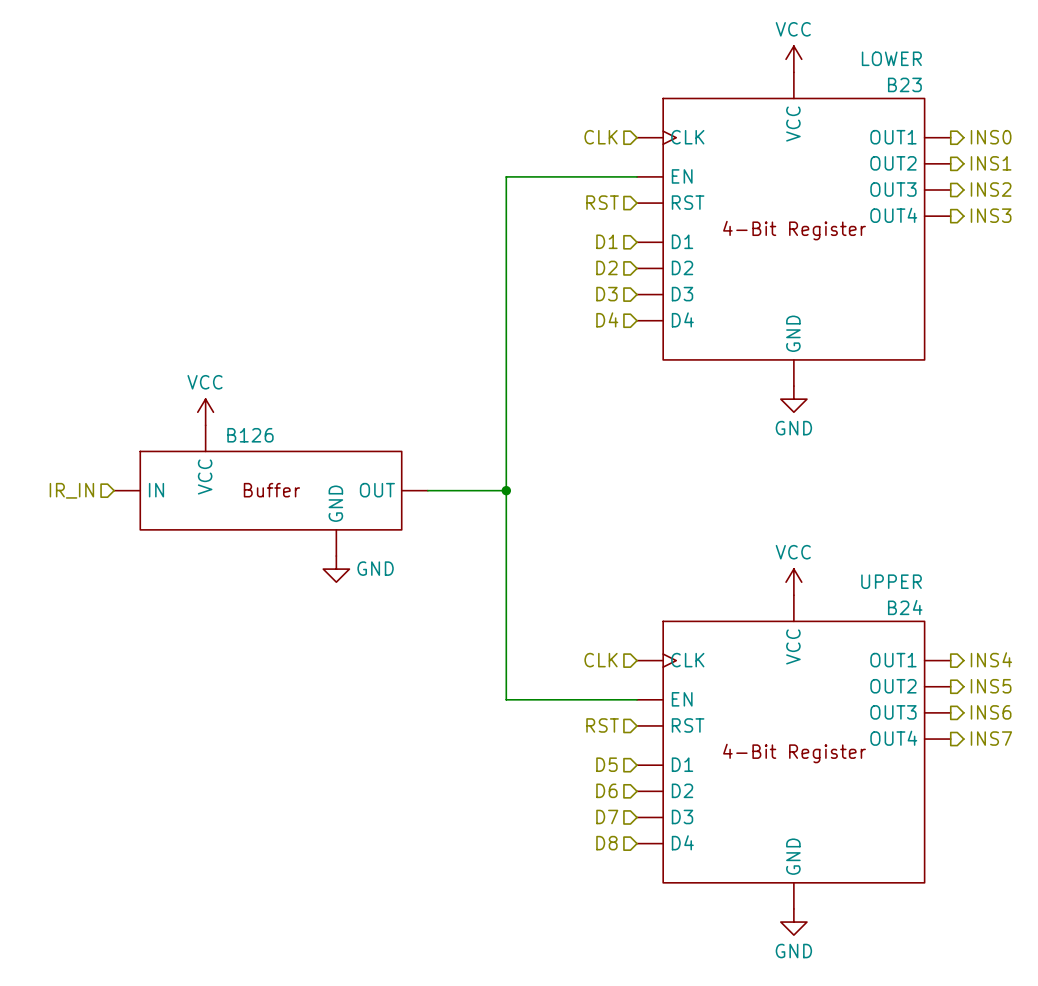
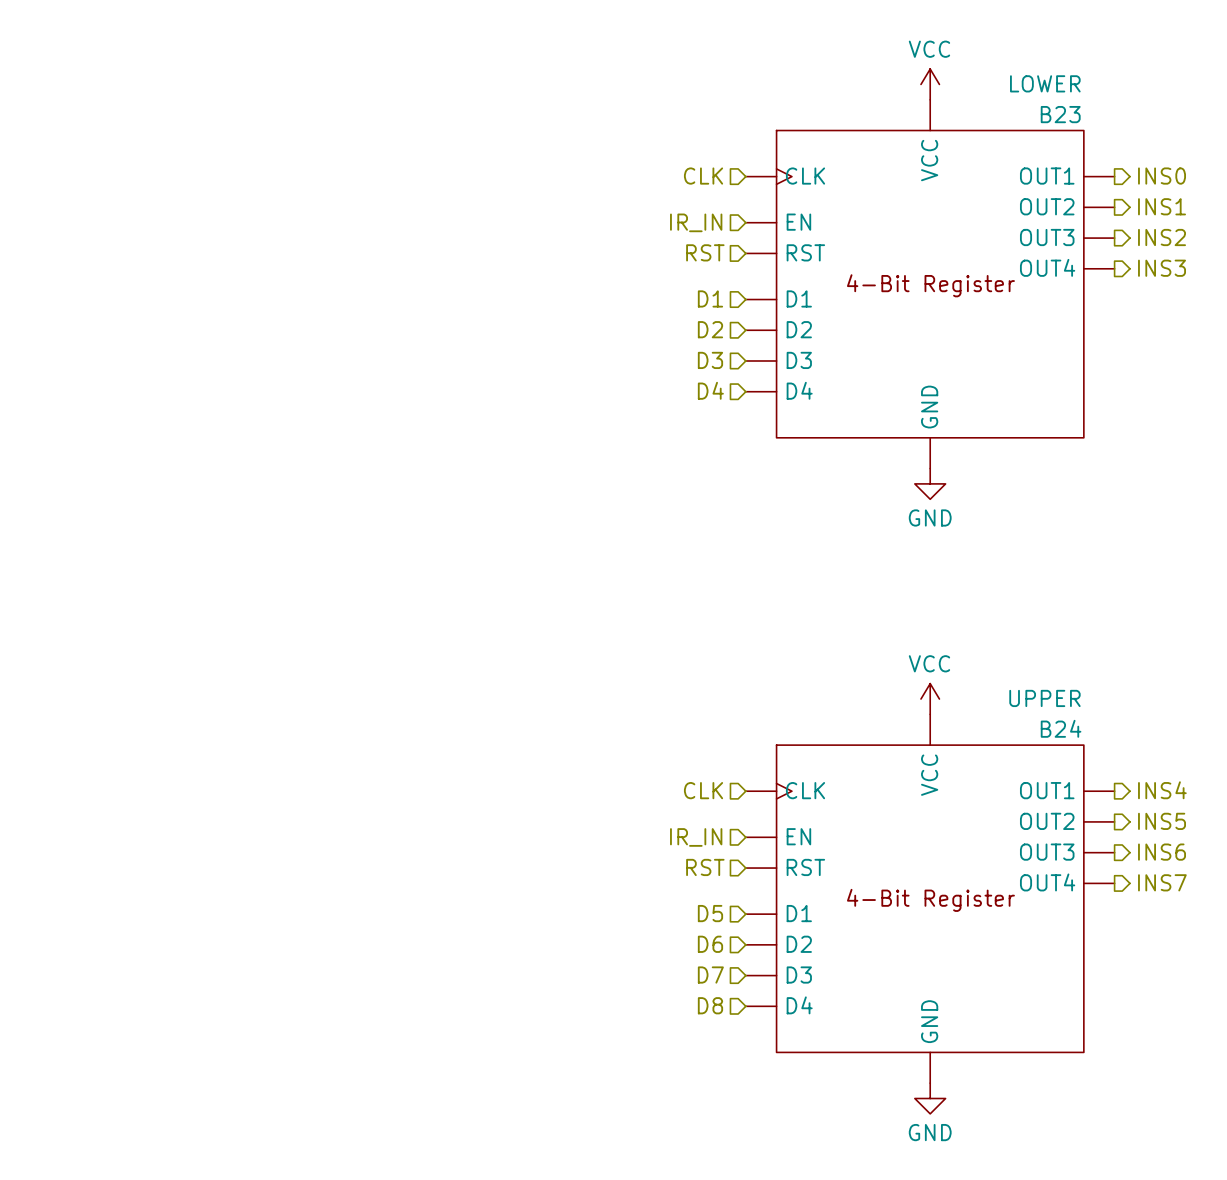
wire: (637, 176) (506, 176) (506, 699) (637, 699) -> none
hierarchical label: none -> IR_IN (696, 222)
power symbol: VCC (205, 412) -> none
hierarchical label: IR_IN (71, 490) -> none
B126: (270, 490) -> none
wire: (427, 490) (506, 490) -> none
junction: (506, 490) -> none
power symbol: GND (336, 569) -> none
hierarchical label: none -> IR_IN (696, 837)

